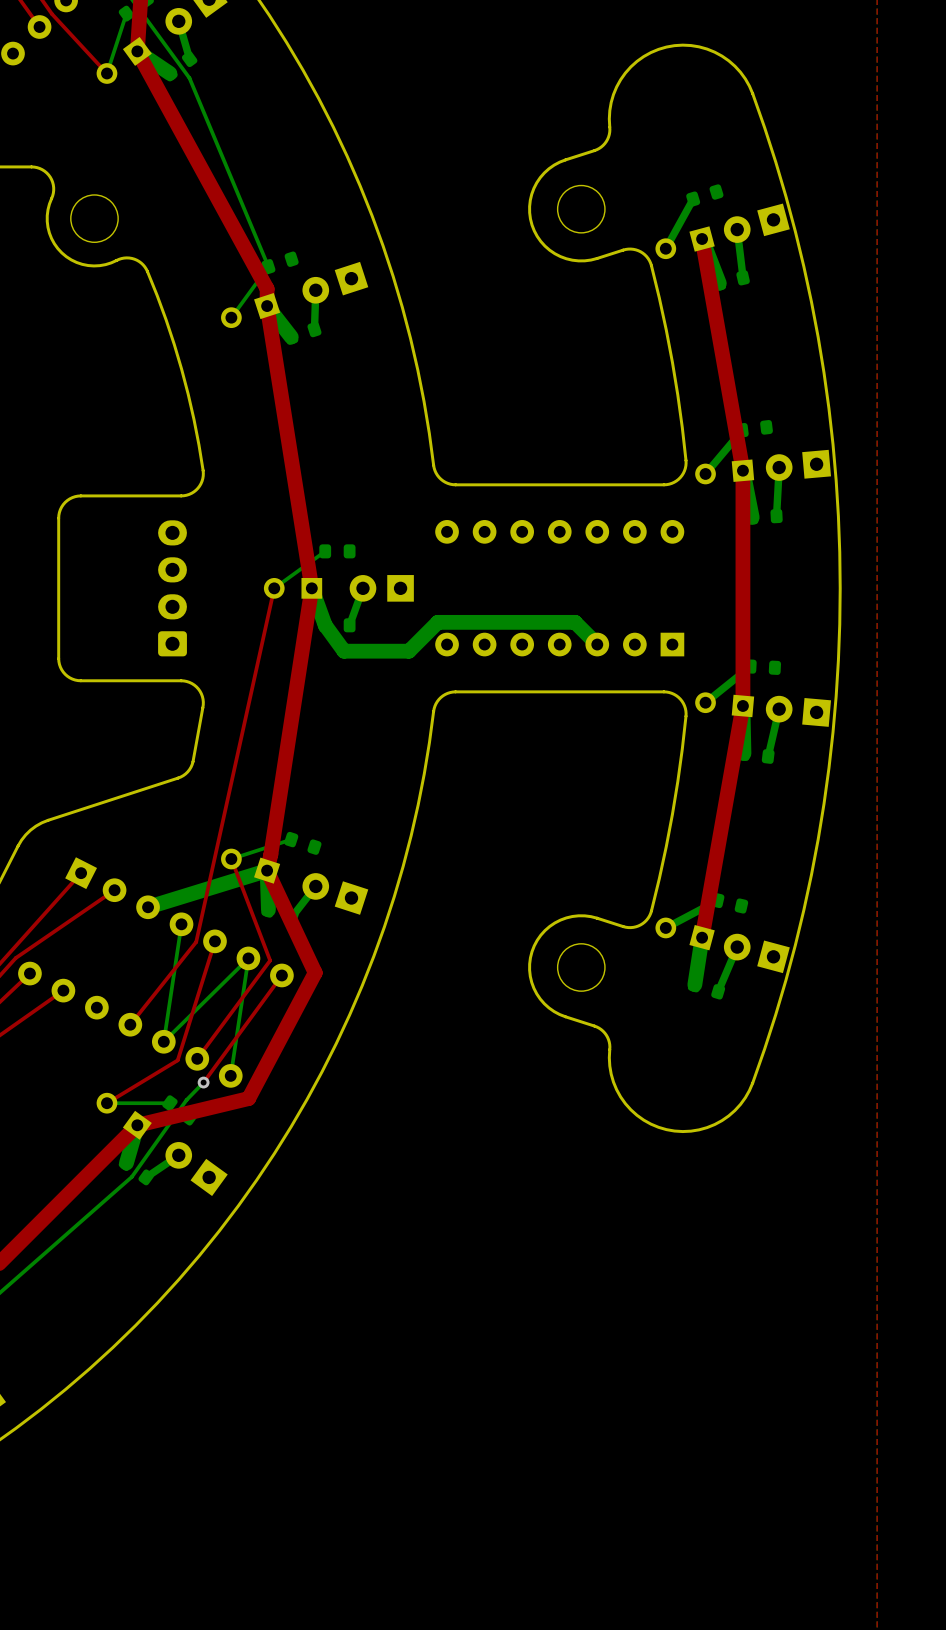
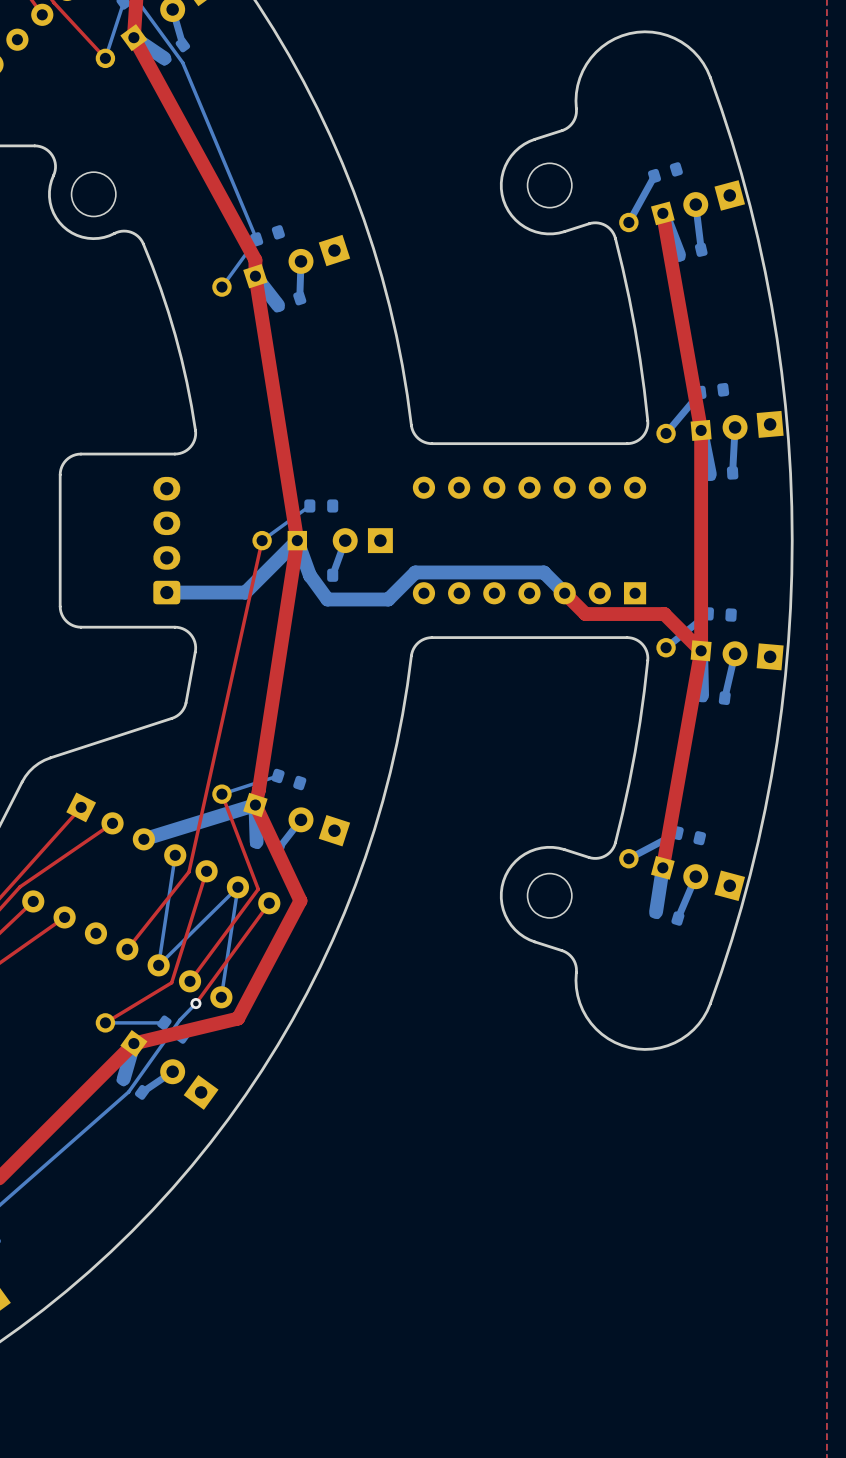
bottom track: none -> (297, 540) (245, 592) (166, 592)
top track: none -> (564, 593) (585, 614) (664, 614) (701, 650)

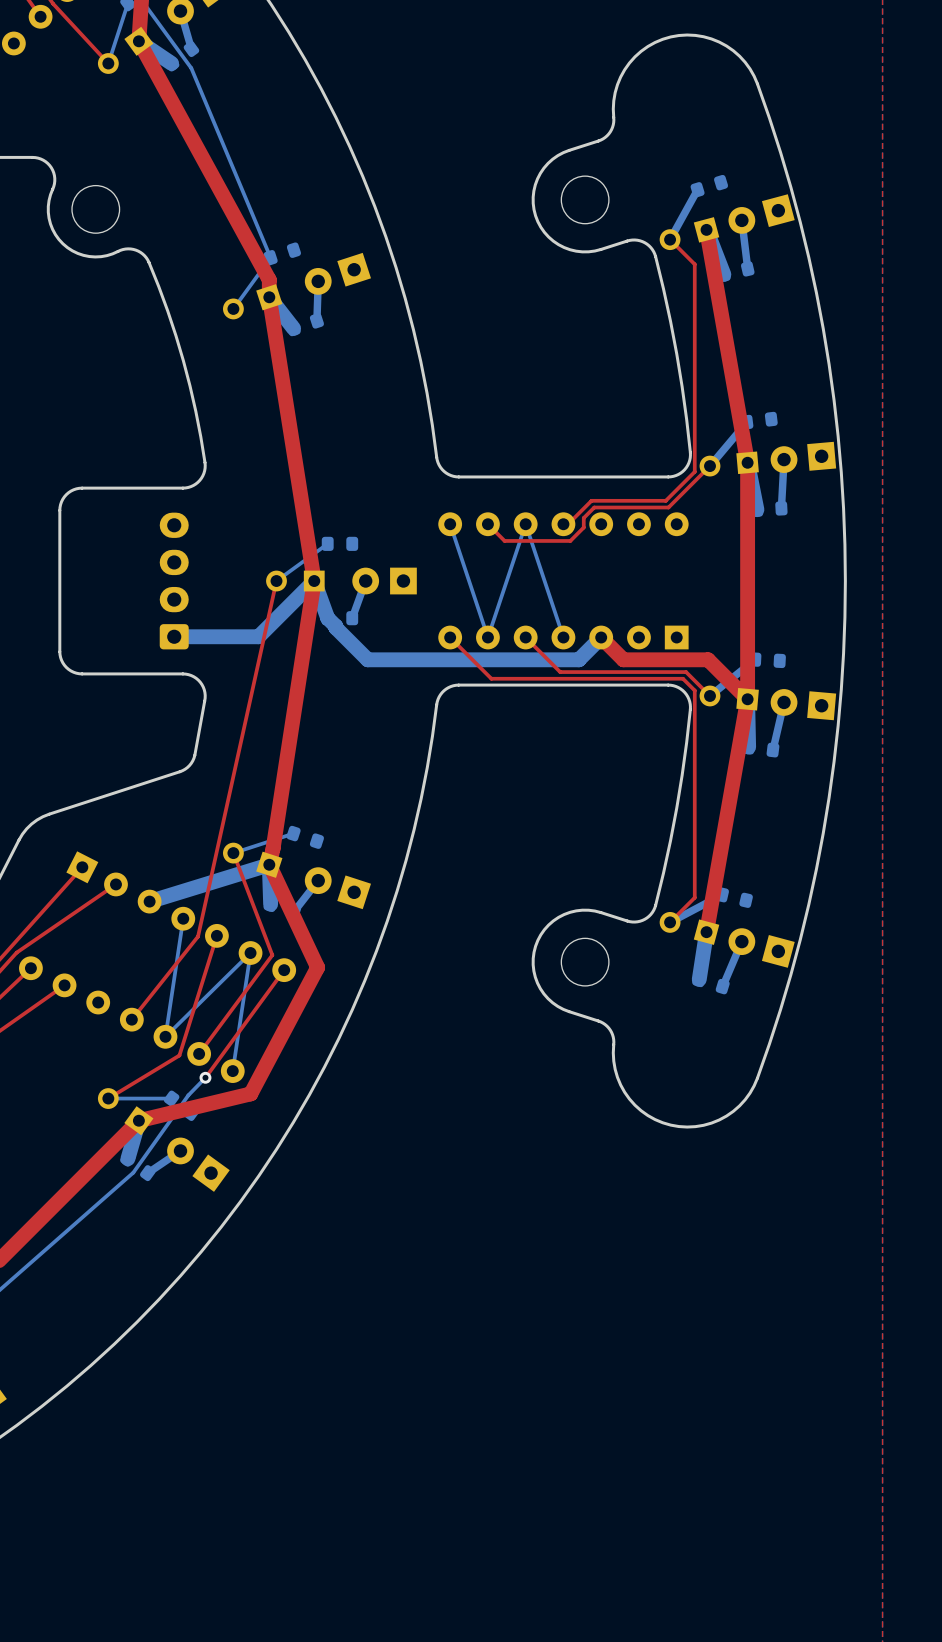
top track: none -> (670, 239) (694, 264) (694, 471) (665, 500) (591, 500) (568, 524) (563, 524)
top track: none -> (709, 466) (668, 507) (594, 507) (583, 518) (583, 527) (570, 540) (504, 540) (487, 524)
bottom track: none -> (450, 524) (487, 637) (525, 524) (563, 637)
bottom track: (309, 575) (327, 599) (388, 599) (415, 572) (543, 572) (564, 593) -> (327, 618) (367, 659) (578, 659) (601, 637)
top track: none -> (450, 637) (491, 678) (682, 678) (694, 690) (694, 897) (670, 922)
top track: none -> (525, 637) (560, 672) (686, 672) (709, 695)

